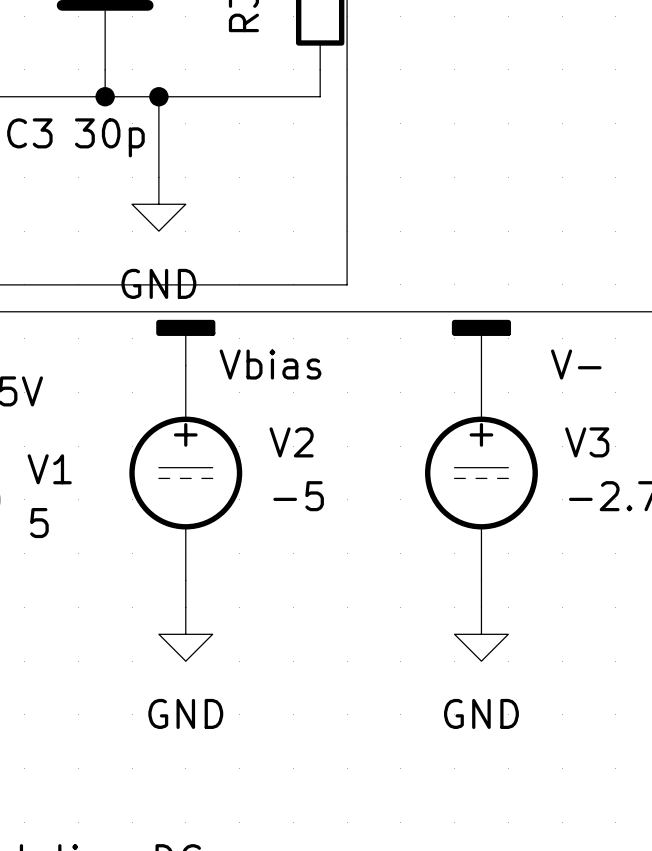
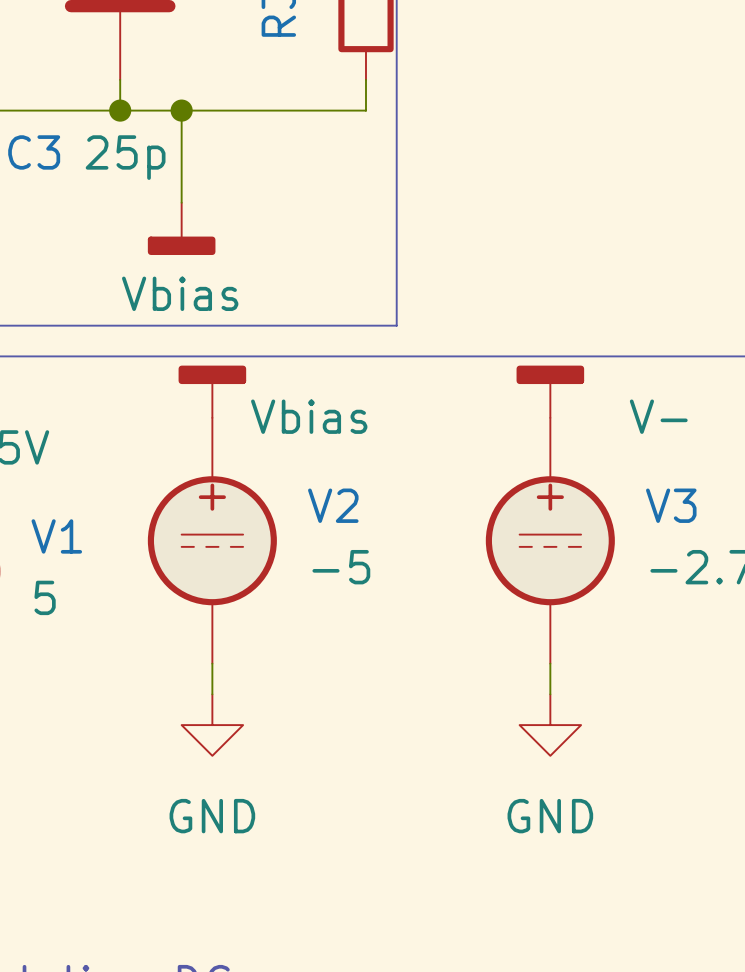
C3 value: 30p (109, 137) -> 25p (125, 157)
power symbol: GND (158, 204) -> Vbias (181, 228)

